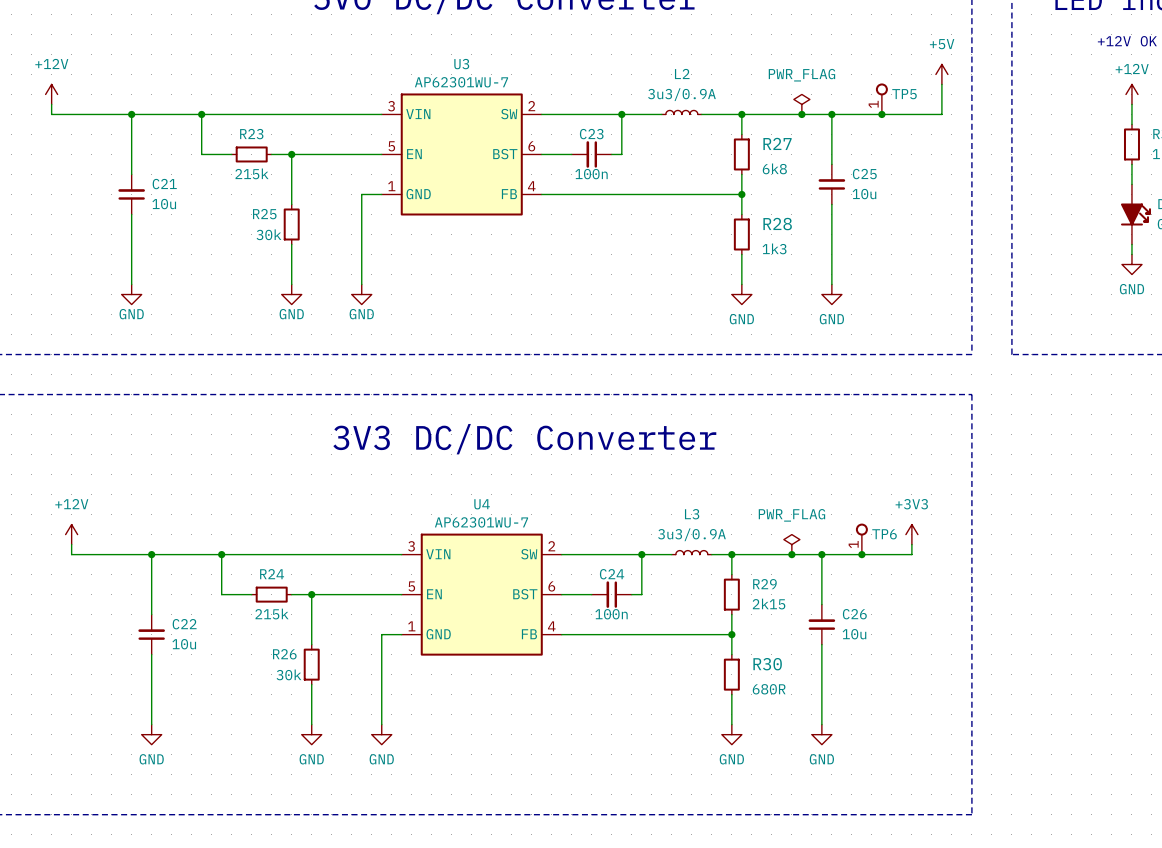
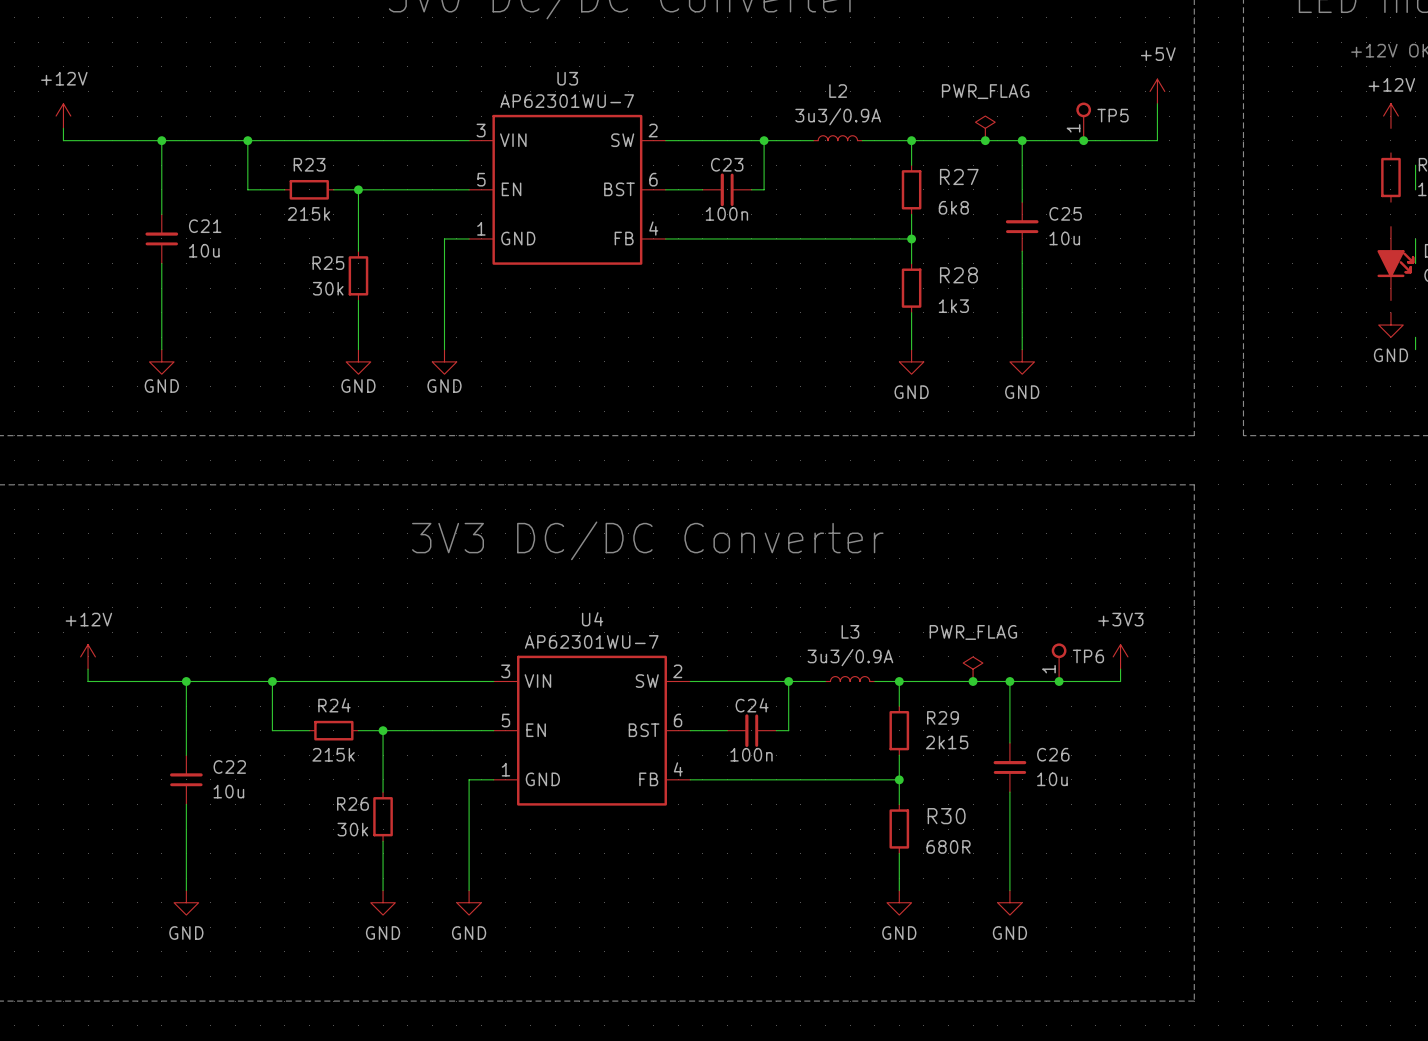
wire: (1131, 104) (1131, 124) -> (1415, 165) (1415, 189)
wire: (1131, 164) (1131, 184) -> (1415, 238) (1415, 263)
wire: (1131, 244) (1131, 254) -> (1415, 337) (1415, 349)

